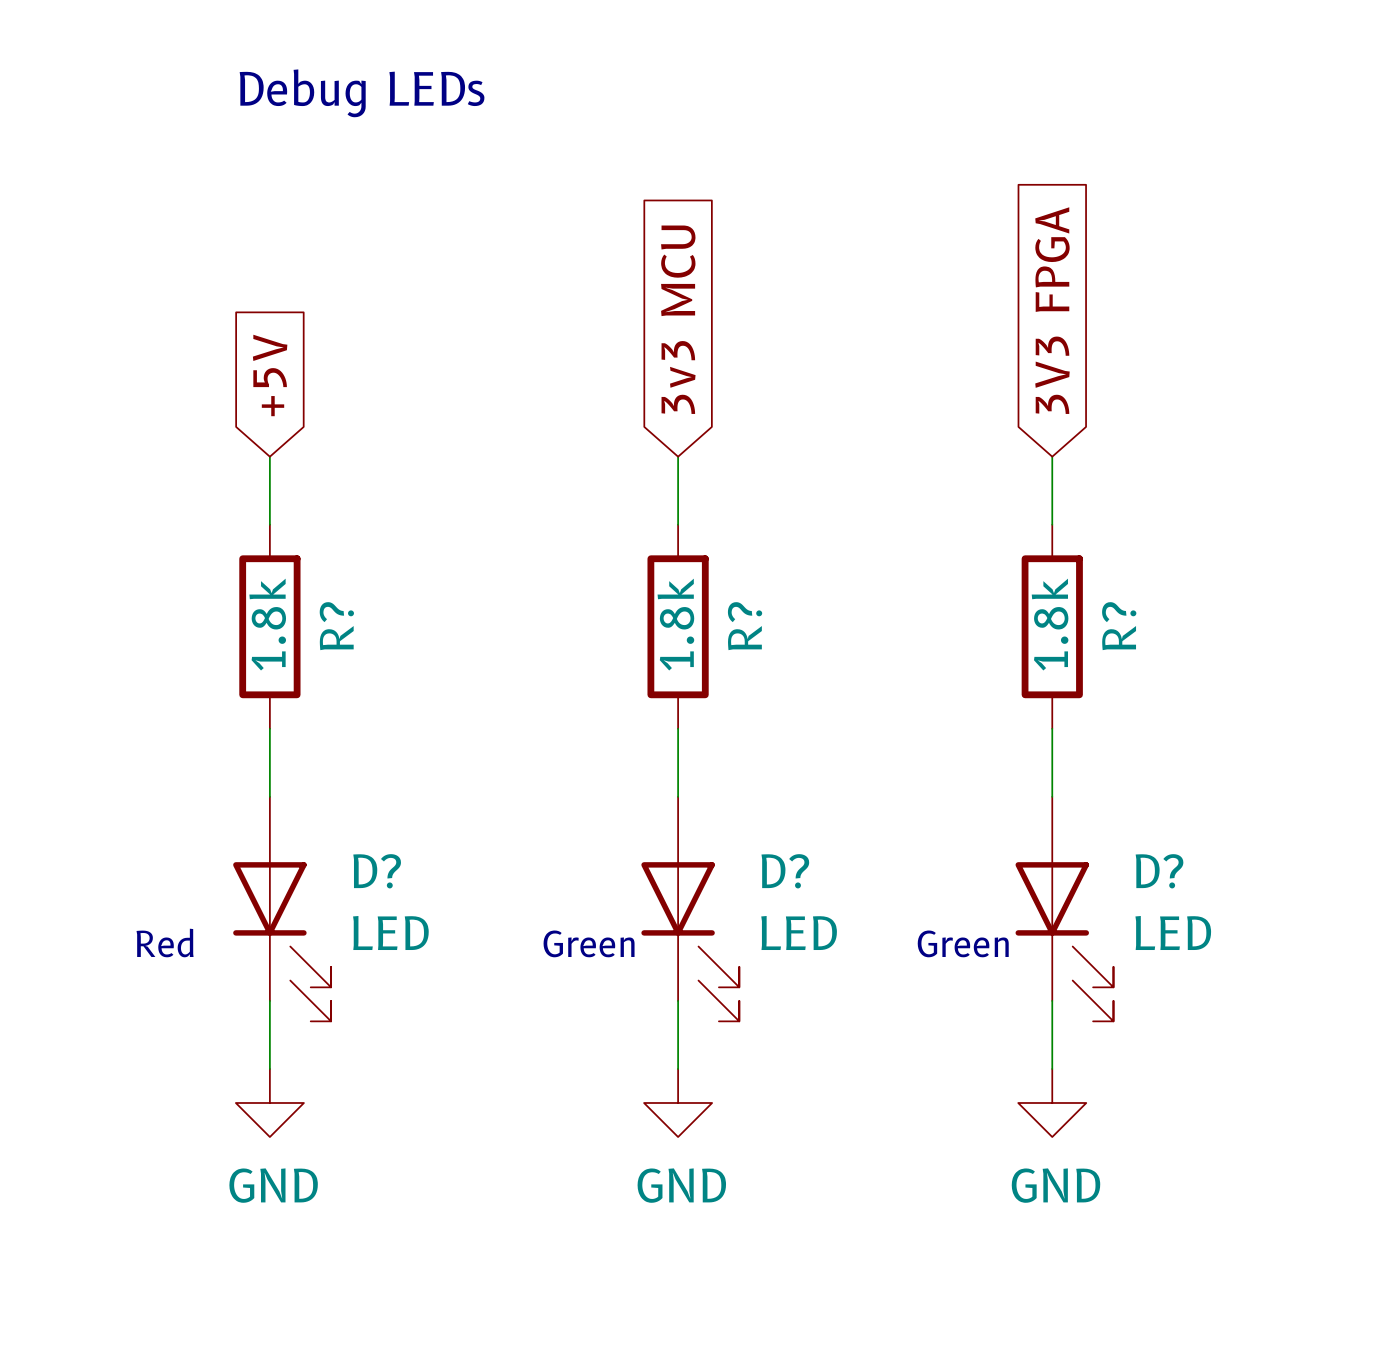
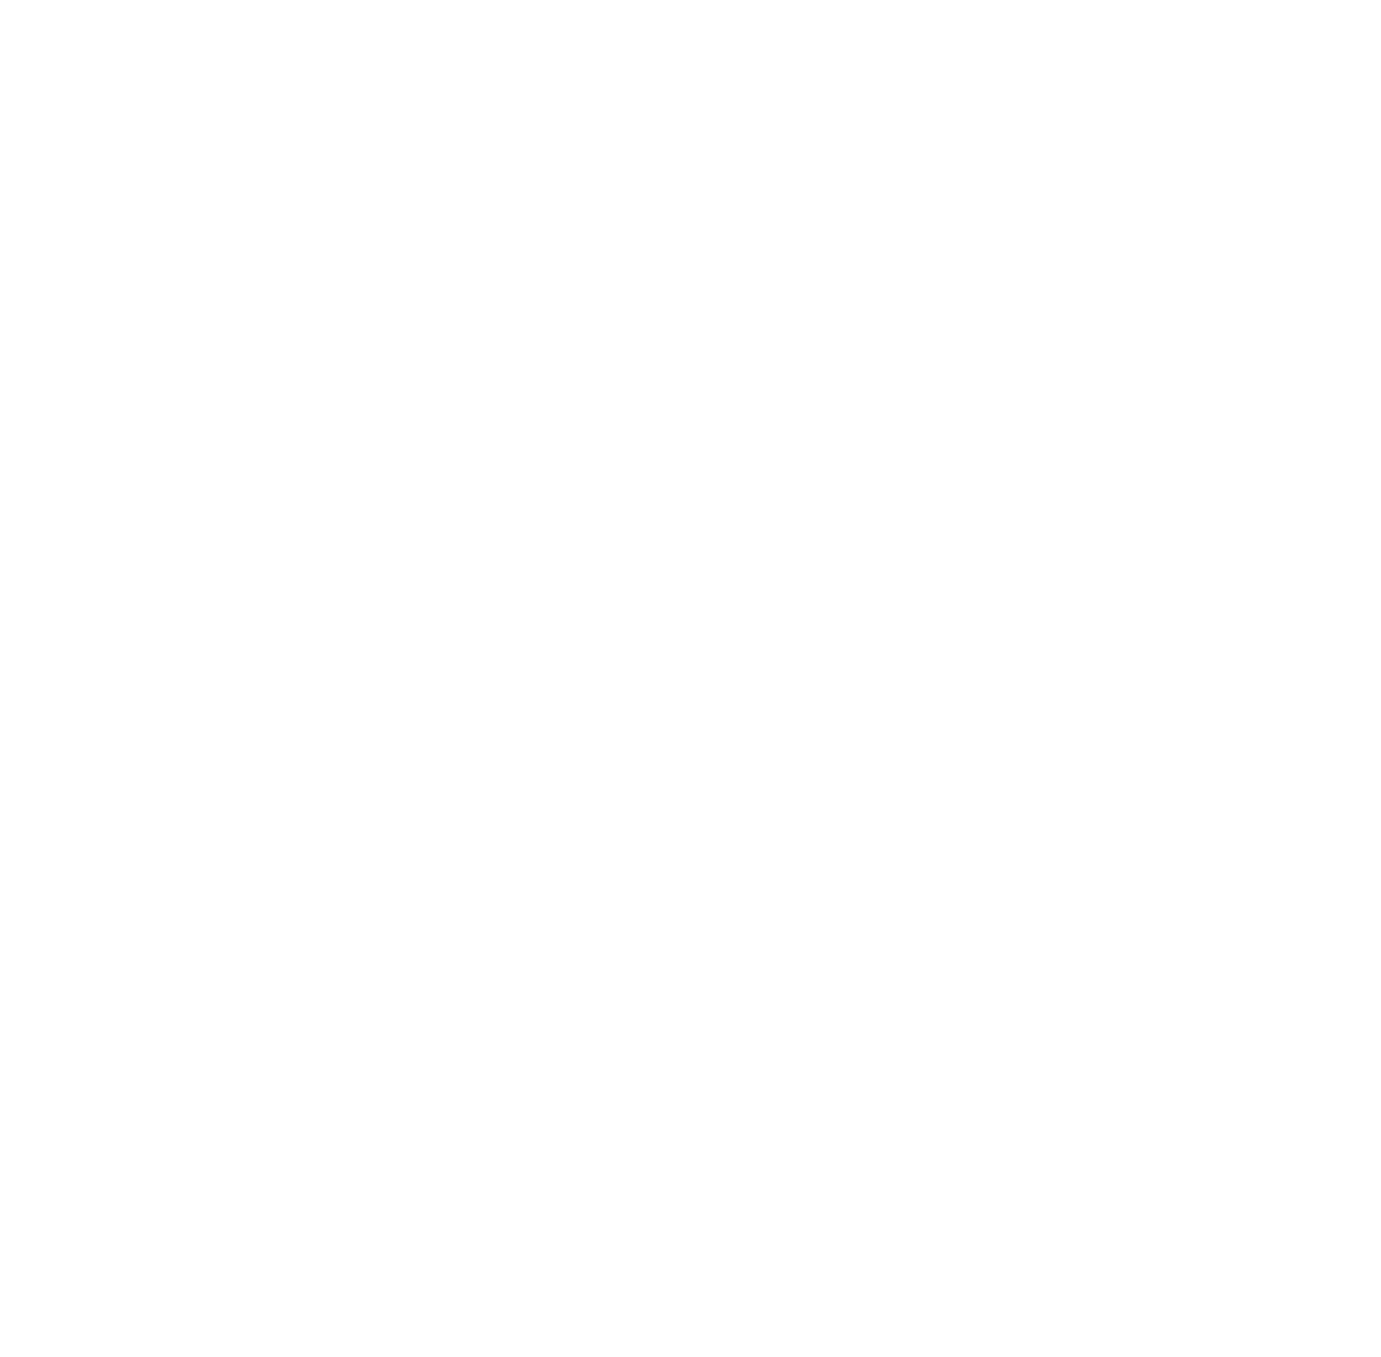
text: Debug LEDs (362, 93) -> none
global label: 3V3 FPGA (1052, 310) -> none
global label: 3v3 MCU (678, 319) -> none
global label: +5V (270, 375) -> none
wire: (269, 456) (269, 524) -> none
wire: (678, 456) (678, 524) -> none
wire: (1052, 456) (1052, 524) -> none
R?: 1.8k (269, 626) -> none
R?: 1.8k (678, 626) -> none
R?: 1.8k (1052, 626) -> none
wire: (269, 728) (269, 796) -> none
wire: (678, 728) (678, 796) -> none
wire: (1052, 728) (1052, 796) -> none
D?: LED (282, 909) -> none
D?: LED (690, 909) -> none
D?: LED (1064, 909) -> none
text: Red (165, 943) -> none
text: Green (589, 943) -> none
text: Green (963, 943) -> none
wire: (269, 1000) (269, 1068) -> none
wire: (678, 1000) (678, 1068) -> none
wire: (1052, 1000) (1052, 1068) -> none
power symbol: GND (269, 1102) -> none
power symbol: GND (678, 1102) -> none
power symbol: GND (1052, 1102) -> none

